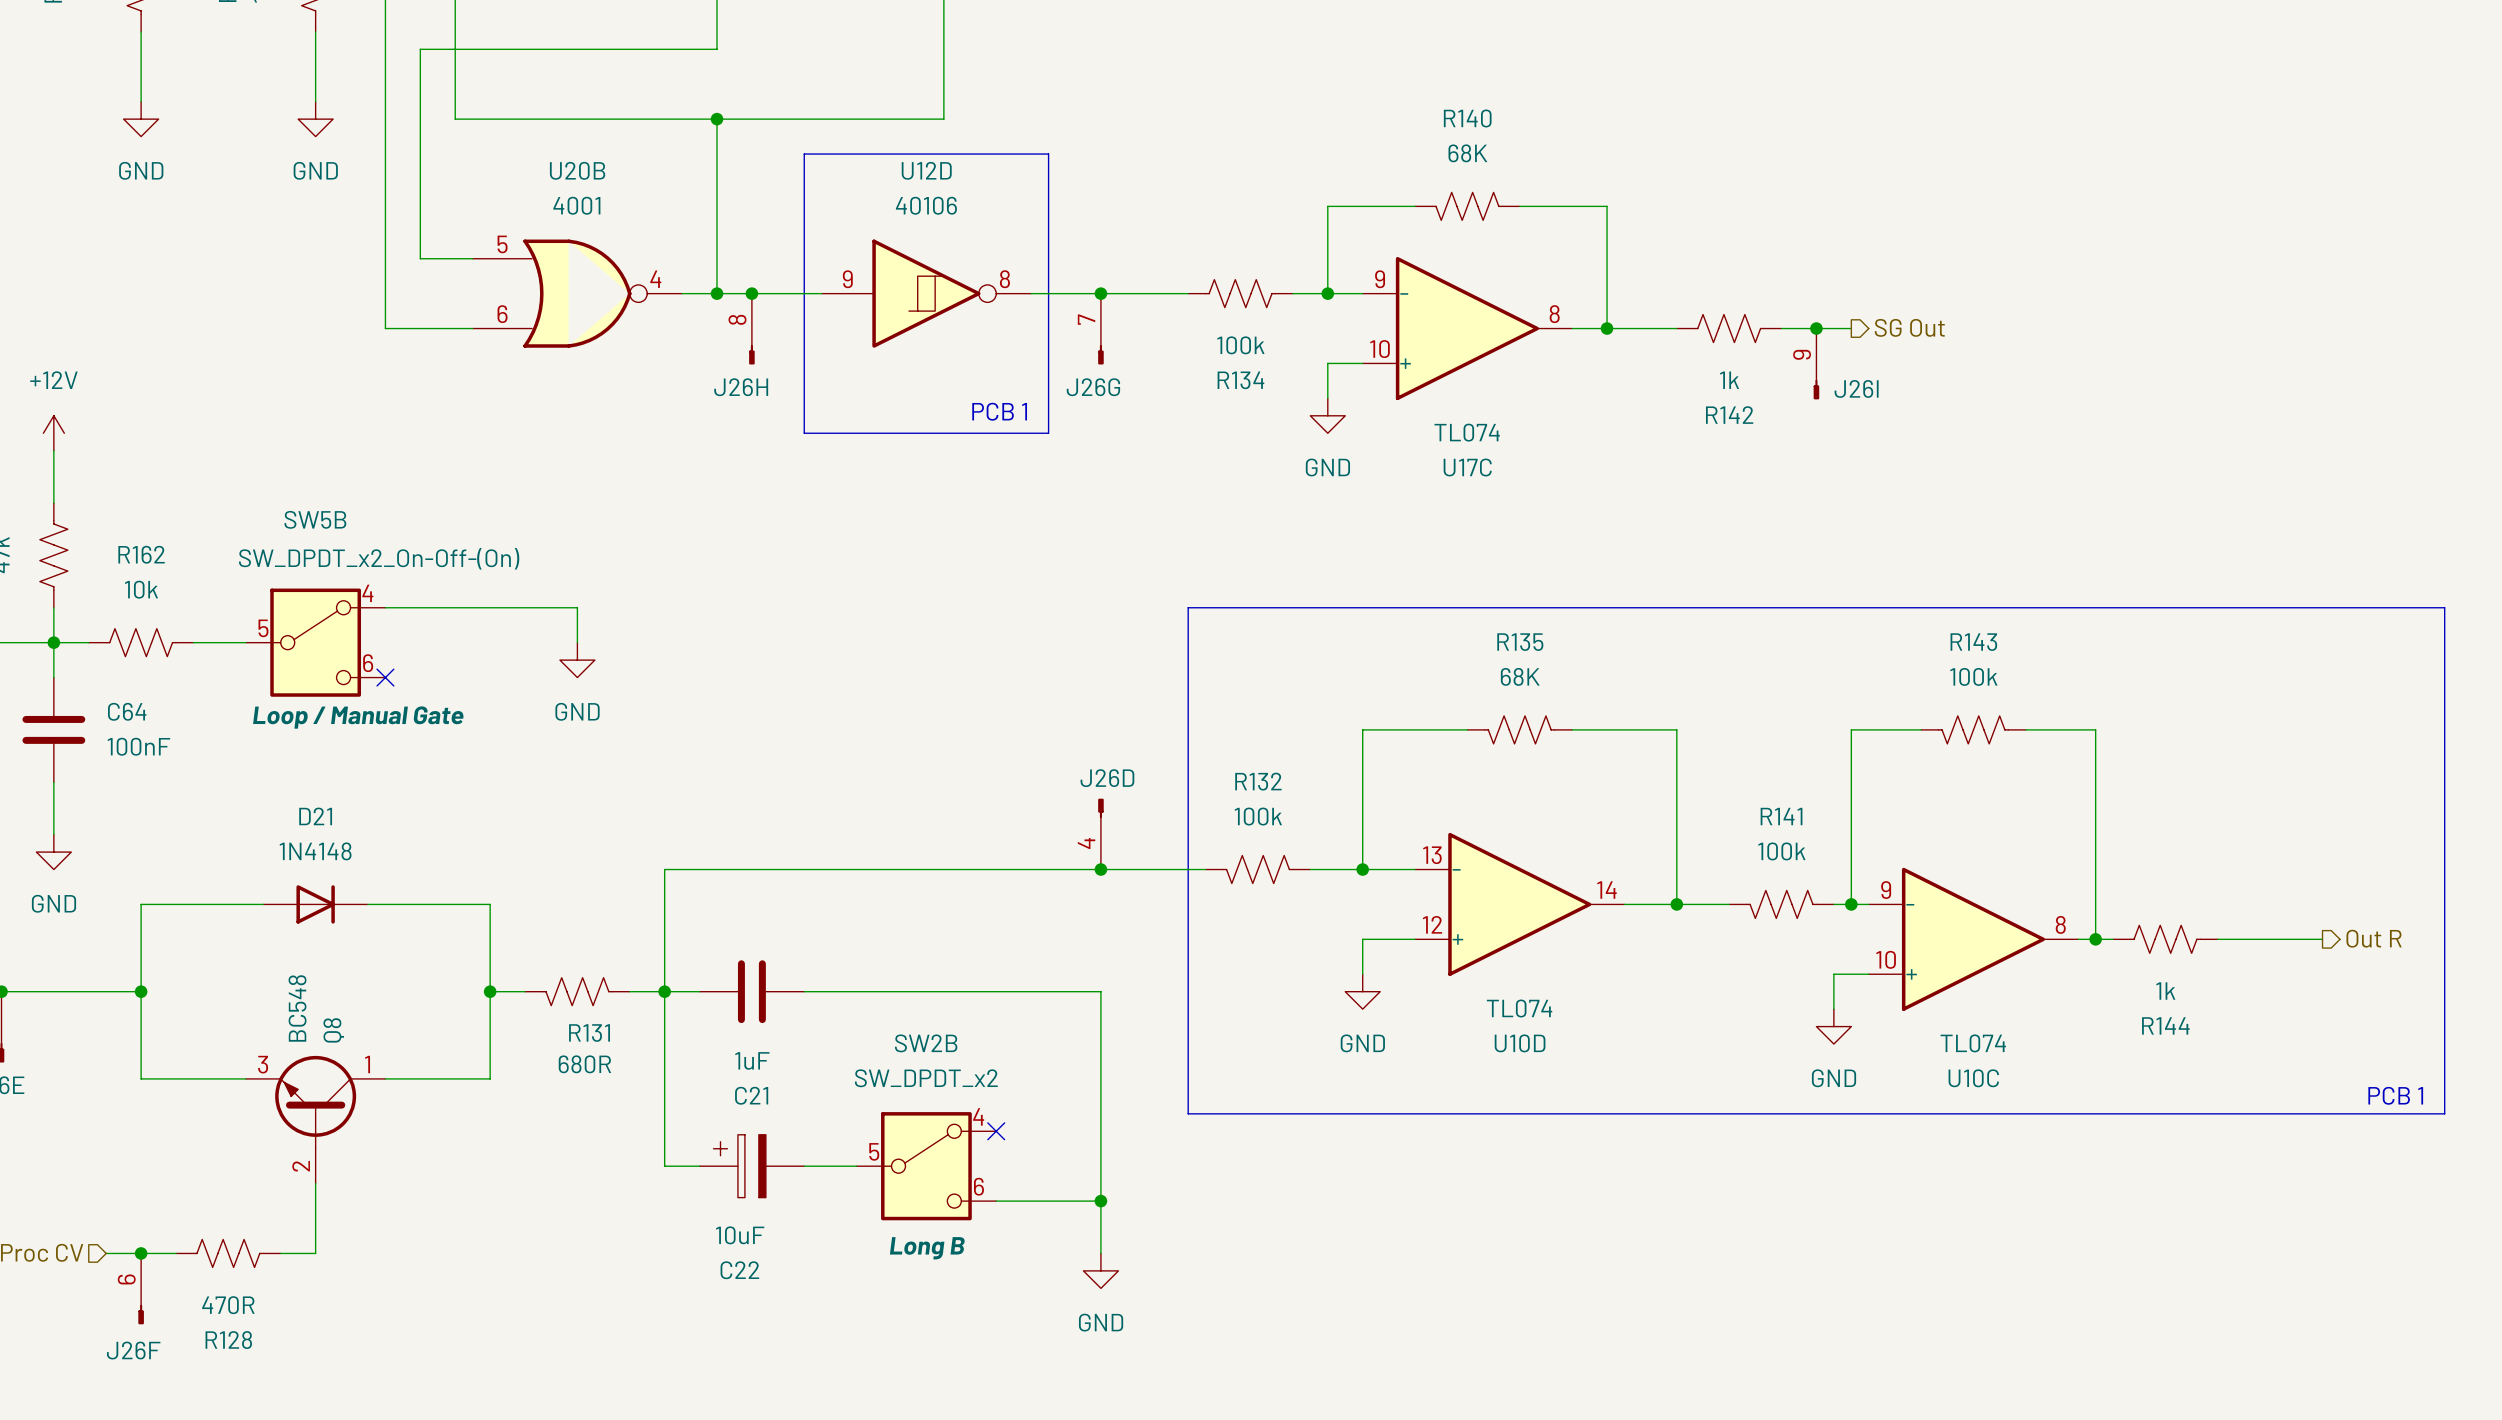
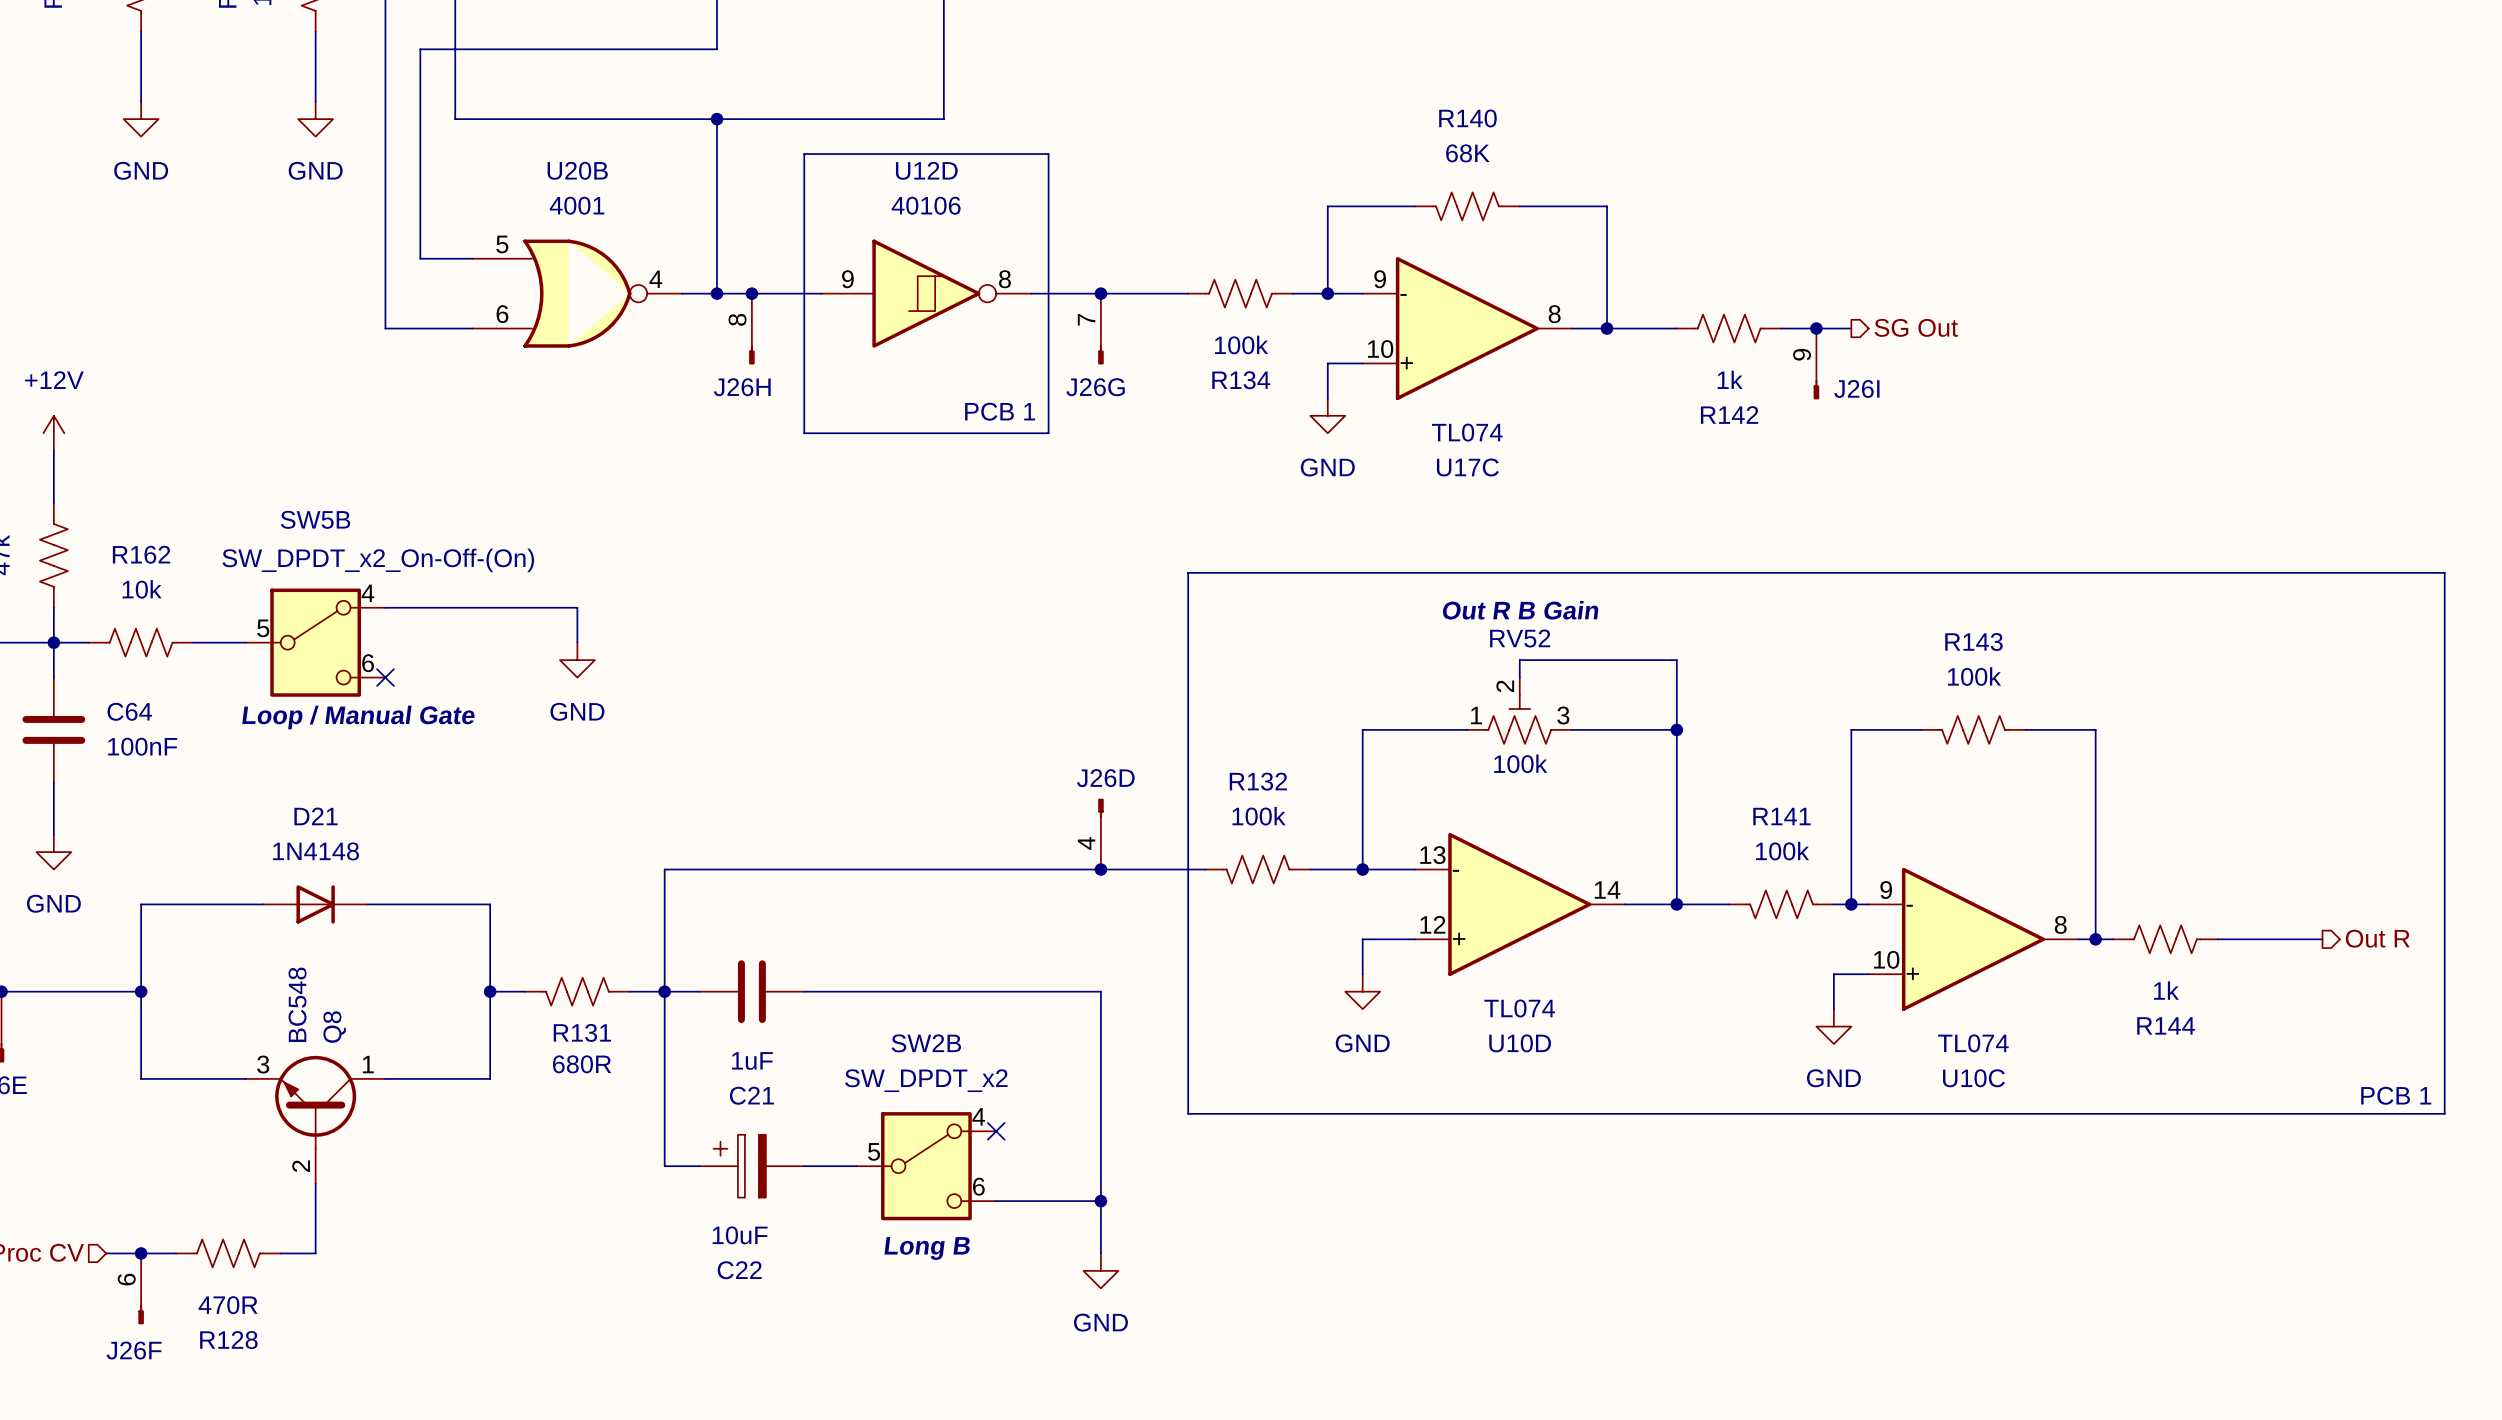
line: (1188, 607) (2444, 607) -> (1188, 607) (1188, 572) (2444, 572) (2444, 607)
wire: none -> (1519, 677) (1519, 660) (1676, 660) (1676, 729)
RV52: none -> 100k (1519, 710)
R135: 68K (1519, 729) -> none
junction: none -> (1676, 729)

